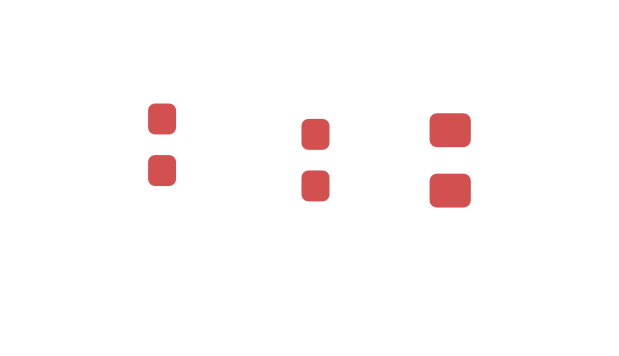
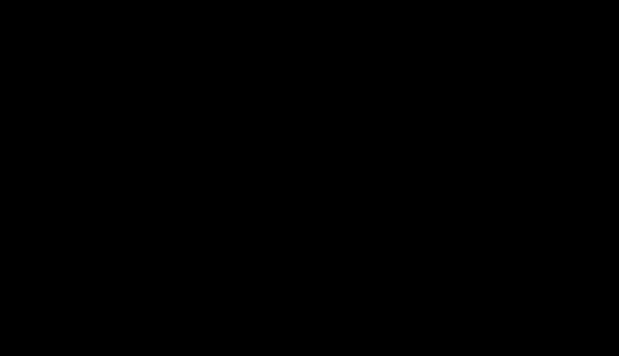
part: (162, 144) -> none
part: (315, 160) -> none
part: (450, 160) -> none

